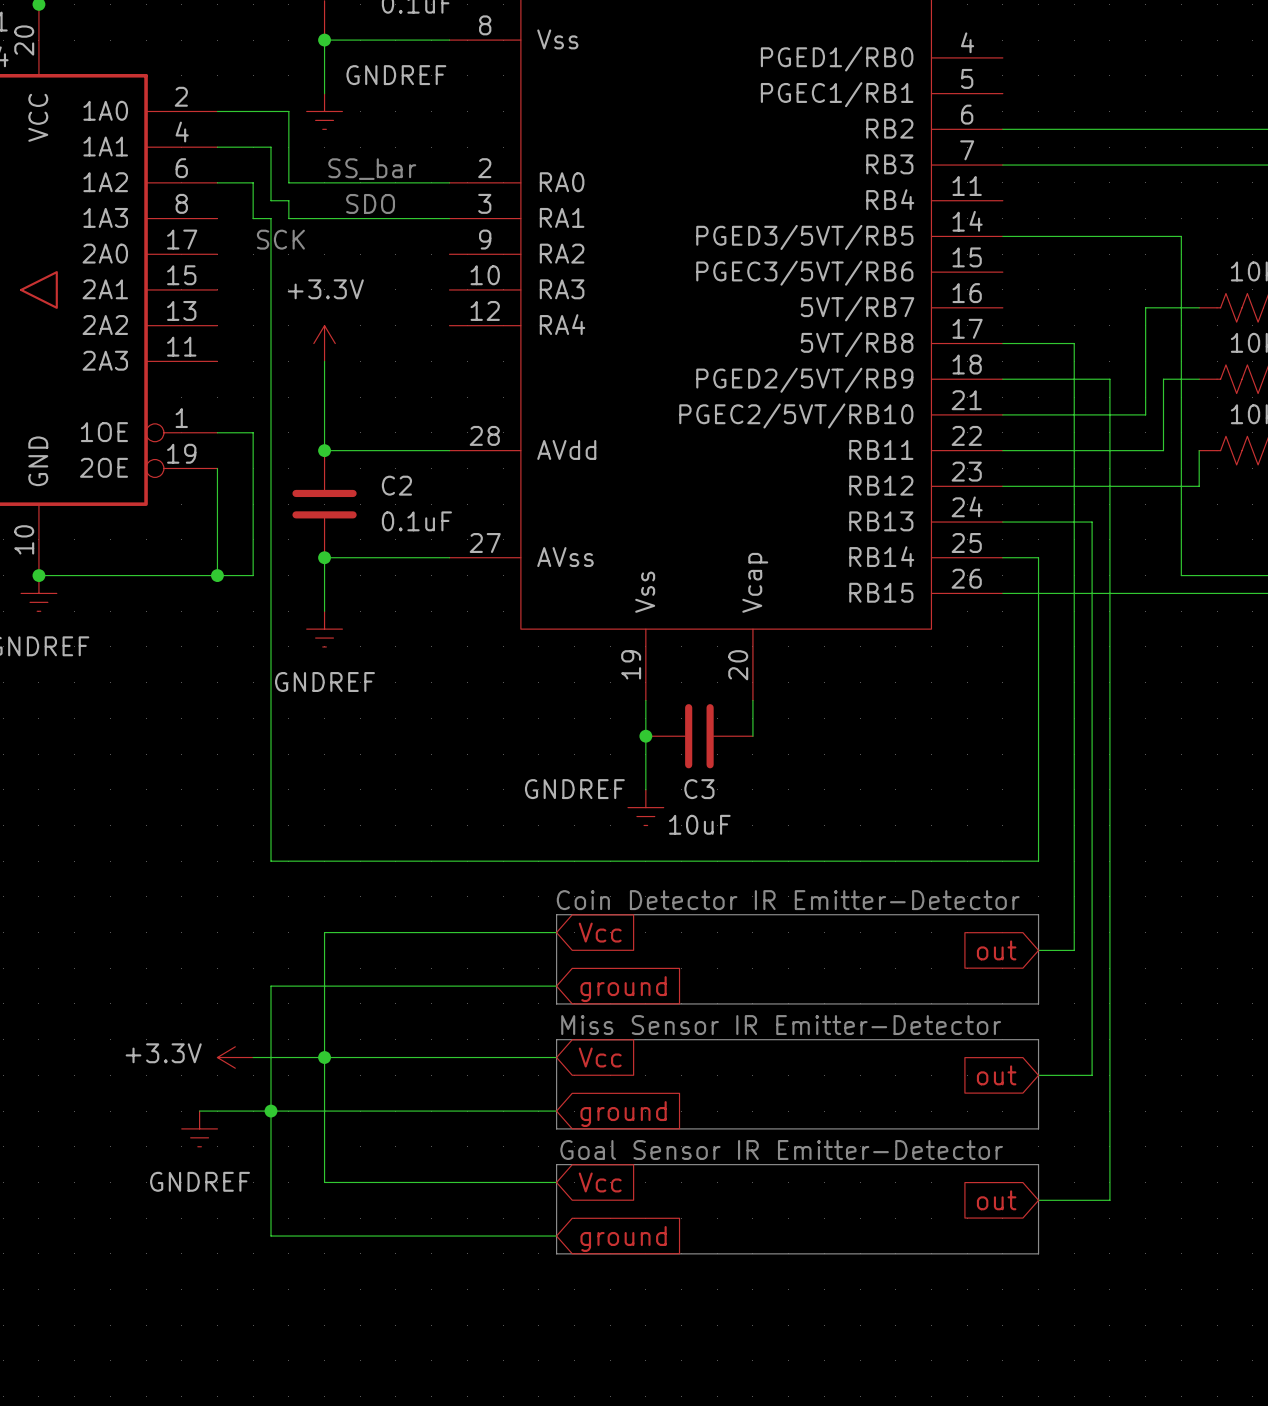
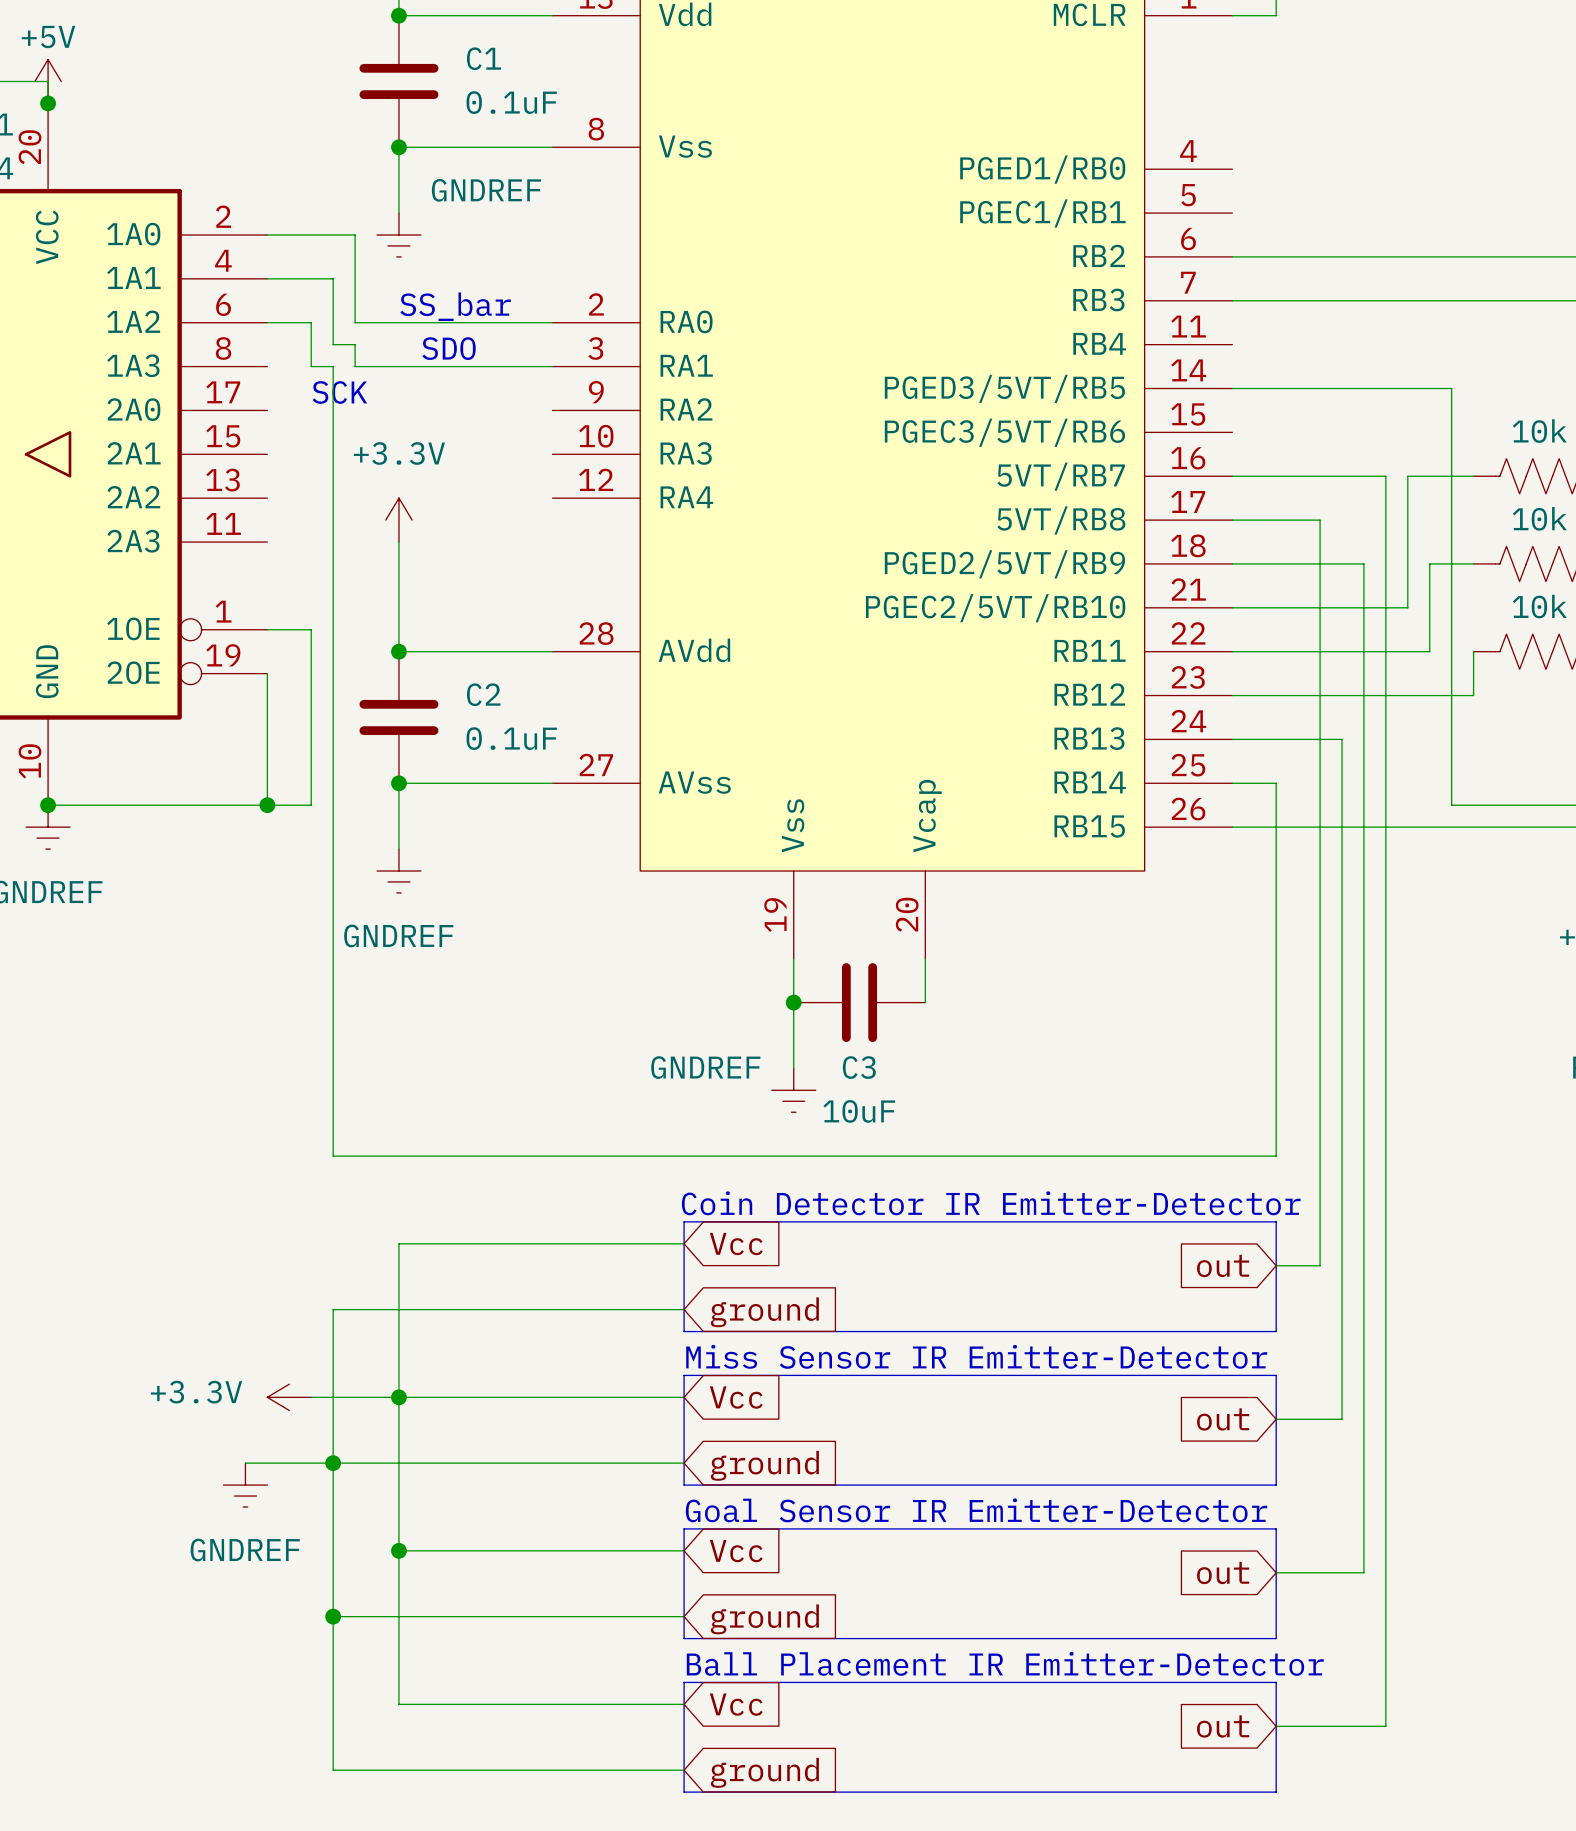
wire: none -> (1232, 476) (1385, 476) (1385, 1726) (1276, 1726)
wire: none -> (398, 1550) (398, 1704) (684, 1704)
junction: none -> (398, 1550)
wire: none -> (333, 1616) (333, 1770) (684, 1770)
junction: none -> (333, 1616)
text: none -> Ball Placement IR Emitter-Detector (1005, 1663)
line: none -> (684, 1682) (1276, 1682) (1276, 1792) (684, 1792) (684, 1682)
global label: none -> Vcc (736, 1704)
global label: none -> out (1223, 1726)
global label: none -> ground (764, 1772)

